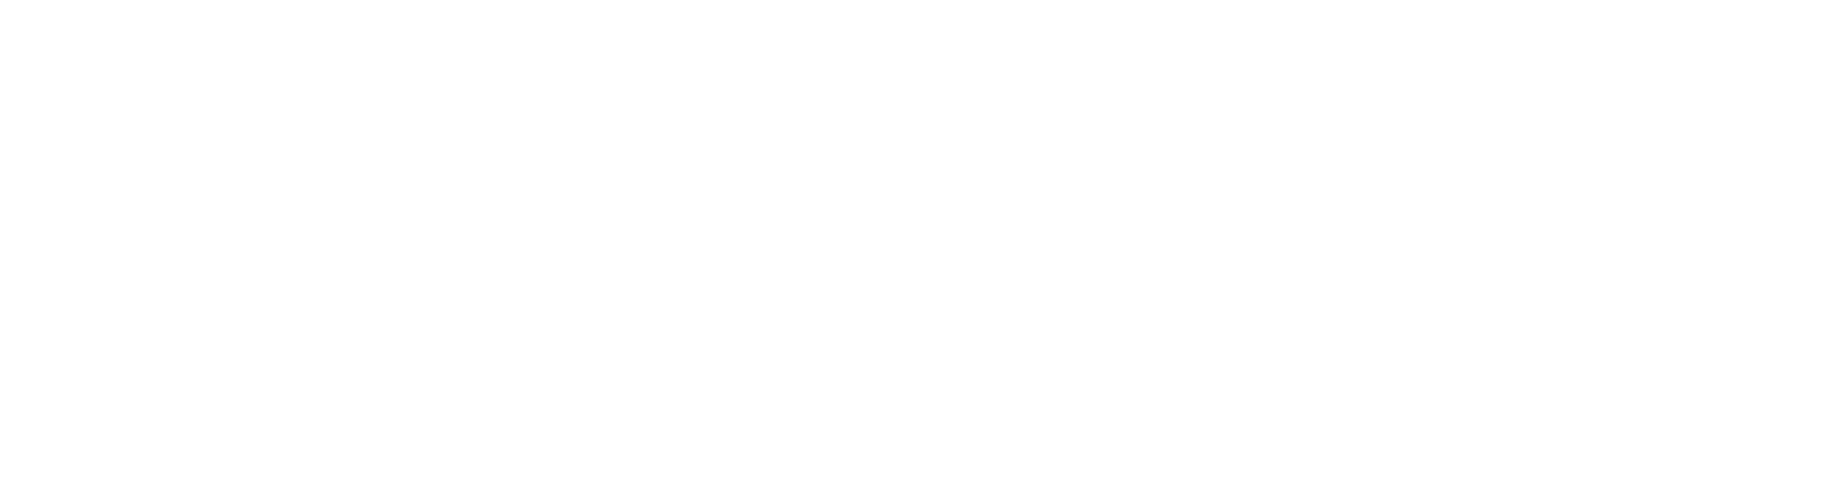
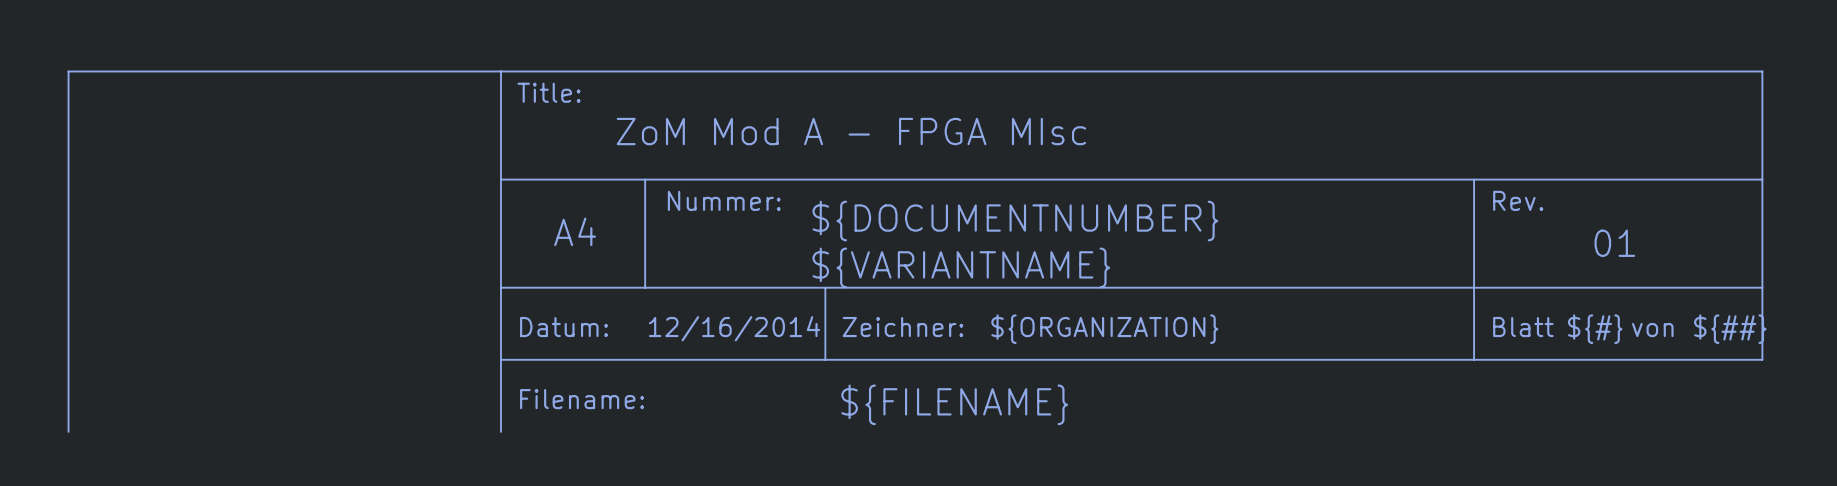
line: none -> (501, 71) (501, 431)
text: none -> Title: (549, 92)
text: none -> ZoM Mod A - FPGA MIsc (851, 131)
line: none -> (501, 179) (1762, 179)
line: none -> (645, 179) (645, 287)
line: none -> (1474, 179) (1474, 359)
text: none -> Nummer: (724, 200)
text: none -> Rev. (1518, 200)
text: none -> ${DOCUMENTNUMBER} (1015, 221)
text: none -> A4 (575, 231)
text: none -> 01 (1614, 243)
text: none -> ${VARIANTNAME} (961, 267)
line: none -> (501, 287) (1762, 287)
line: none -> (825, 287) (825, 359)
text: none -> Datum: (564, 327)
text: none -> 12/16/2014 (734, 328)
text: none -> Zeichner: (902, 327)
text: none -> ${ORGANIZATION} (1104, 329)
text: none -> Blatt (1523, 327)
text: none -> ${#} (1595, 329)
text: none -> ${##} (1730, 329)
text: none -> von (1652, 330)
line: none -> (501, 359) (1762, 359) (1762, 71) (68, 71) (68, 431)
text: none -> Filename: (582, 399)
text: none -> ${FILENAME} (954, 404)

